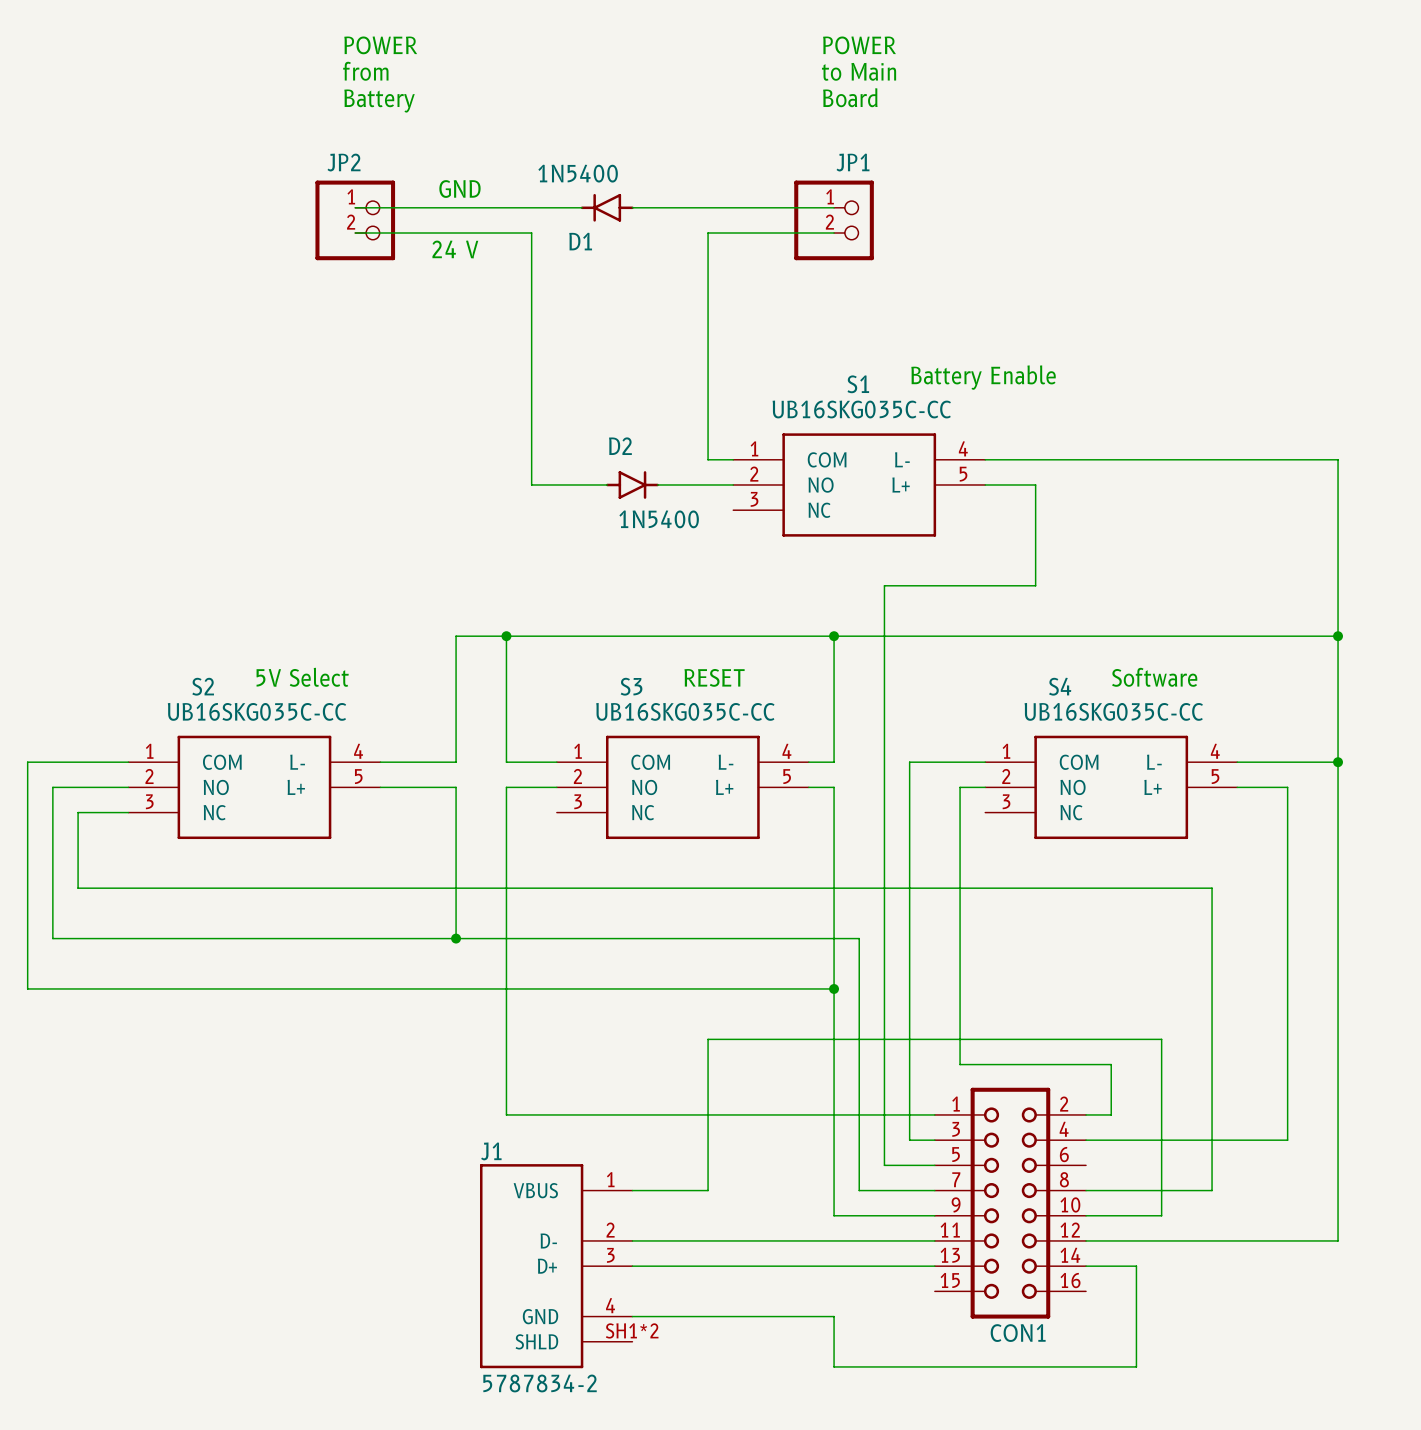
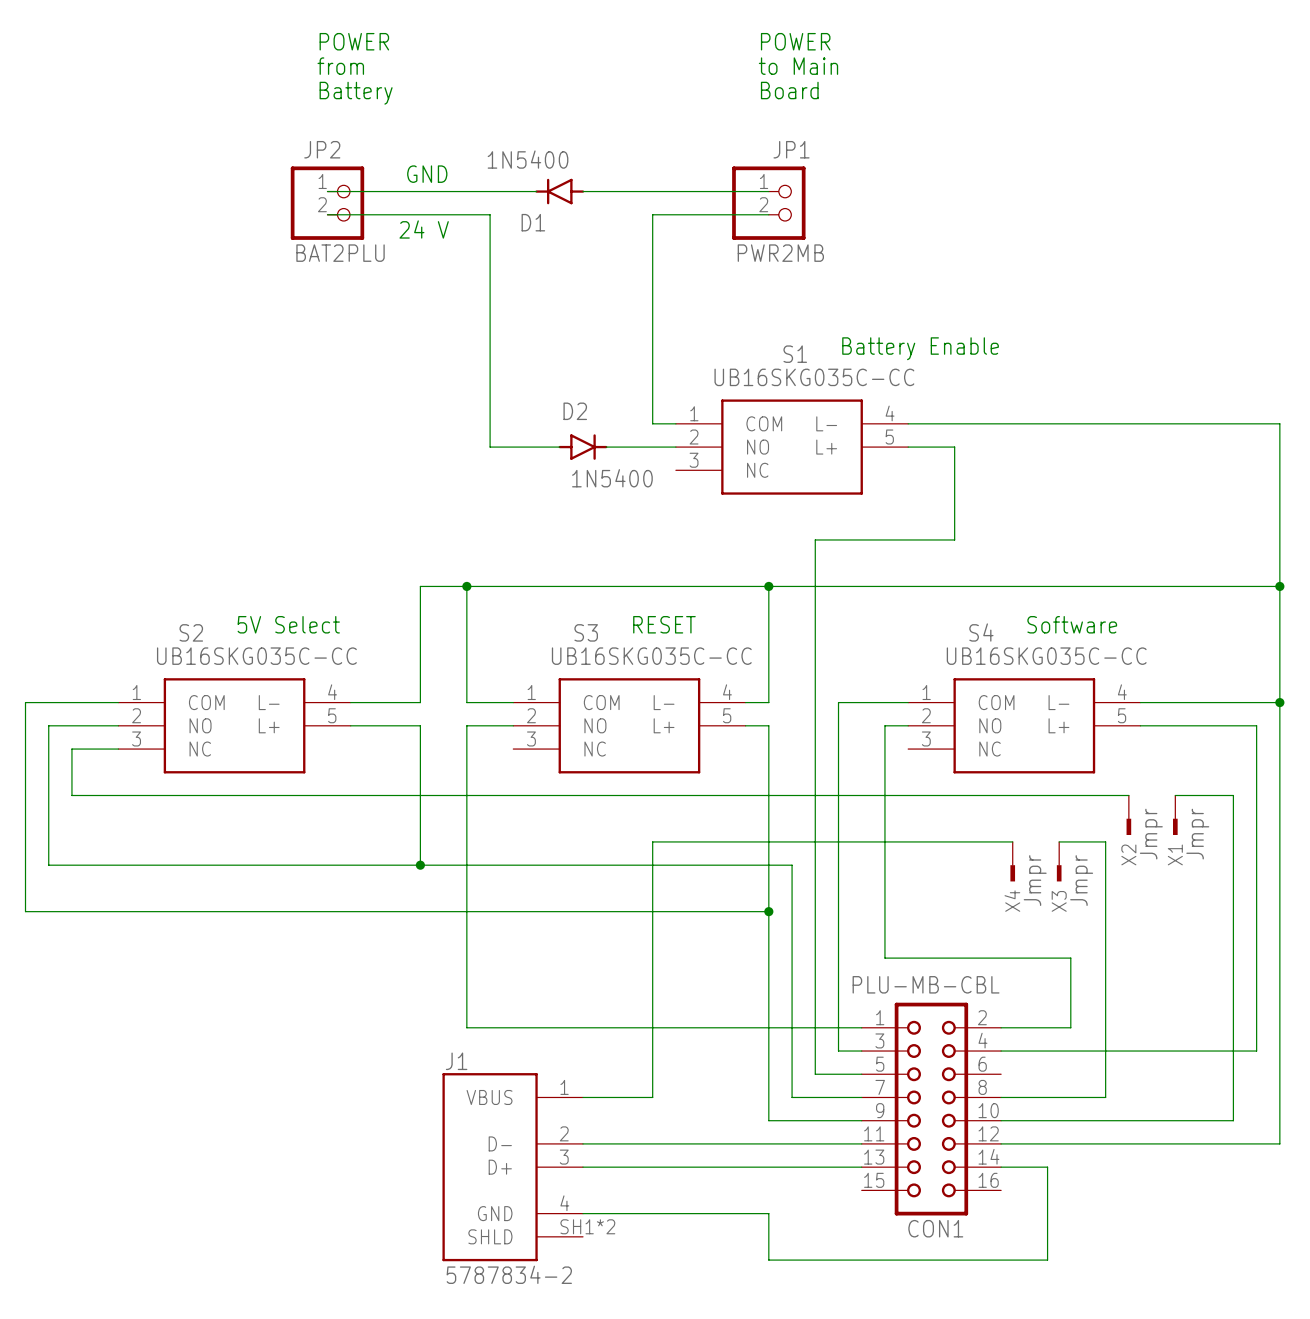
JP2 value: none -> BAT2PLU (340, 253)
JP1 value: none -> PWR2MB (780, 253)
wire: (1338, 459) (1338, 862) -> (1233, 423) (1279, 423) (1279, 1143) (1233, 1143)
wire: none -> (1233, 586) (1279, 586)
junction position: (1338, 636) -> (1279, 586)
wire: none -> (1233, 702) (1279, 702)
junction position: (1338, 762) -> (1279, 702)
wire: (1287, 787) (1287, 1140) -> (1186, 725) (1256, 725) (1256, 1051) (1186, 1051)
wire: (78, 862) (78, 888) (1212, 888) (1212, 1190) (1199, 1190) -> (71, 795) (1128, 795)
wire: none -> (1175, 795) (1233, 795)
X2: none -> Jmpr (1128, 815)
X1: none -> Jmpr (1175, 815)
wire: none -> (1059, 841) (1105, 841) (1105, 1097)
X4: none -> Jmpr (1012, 861)
X3: none -> Jmpr (1059, 861)
wire: (708, 1039) (960, 1039) (960, 1064) (1111, 1064) (1111, 1114) -> (652, 958) (652, 841) (1012, 841)
CON1 value: none -> PLU-MB-CBL (926, 984)
wire: (1161, 1114) (1161, 1215) -> (1070, 1027) (1024, 1027)
wire: (1338, 1215) (1338, 1240) -> (1233, 1120) (1070, 1120)

